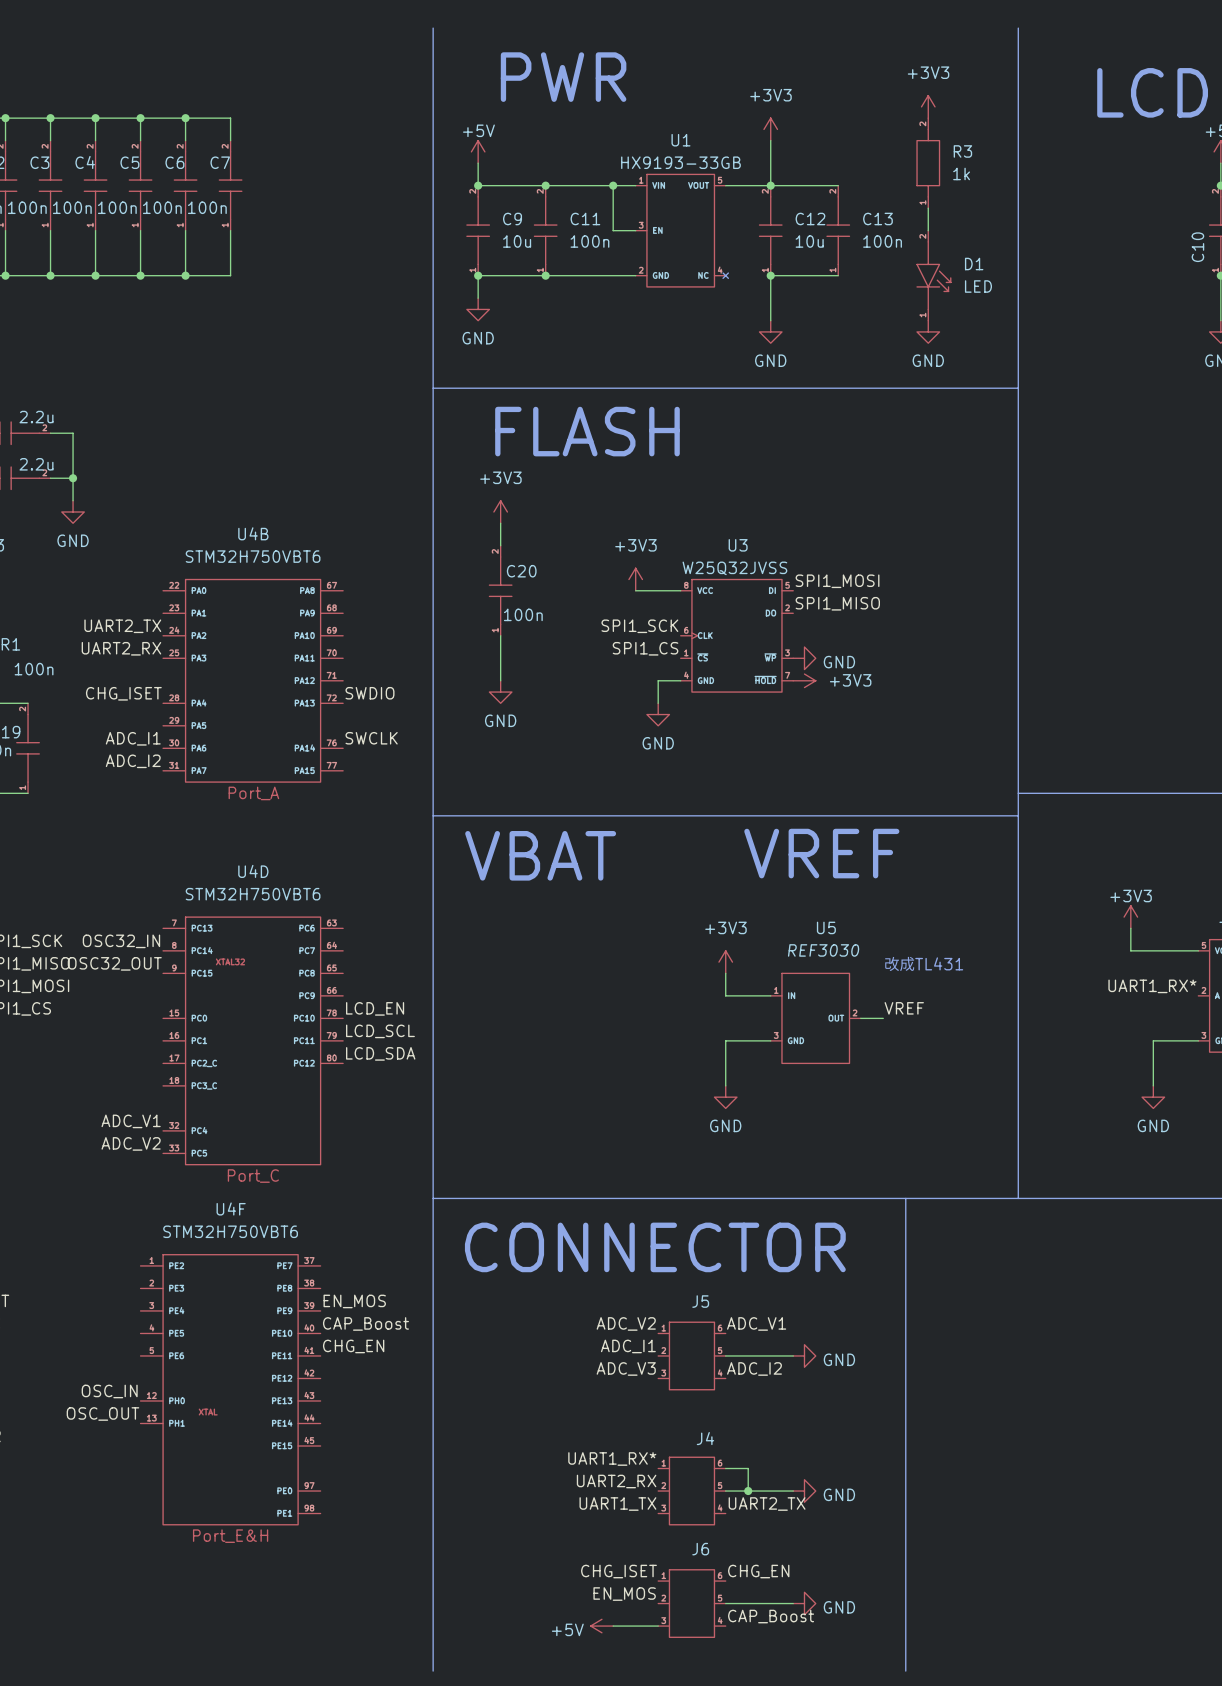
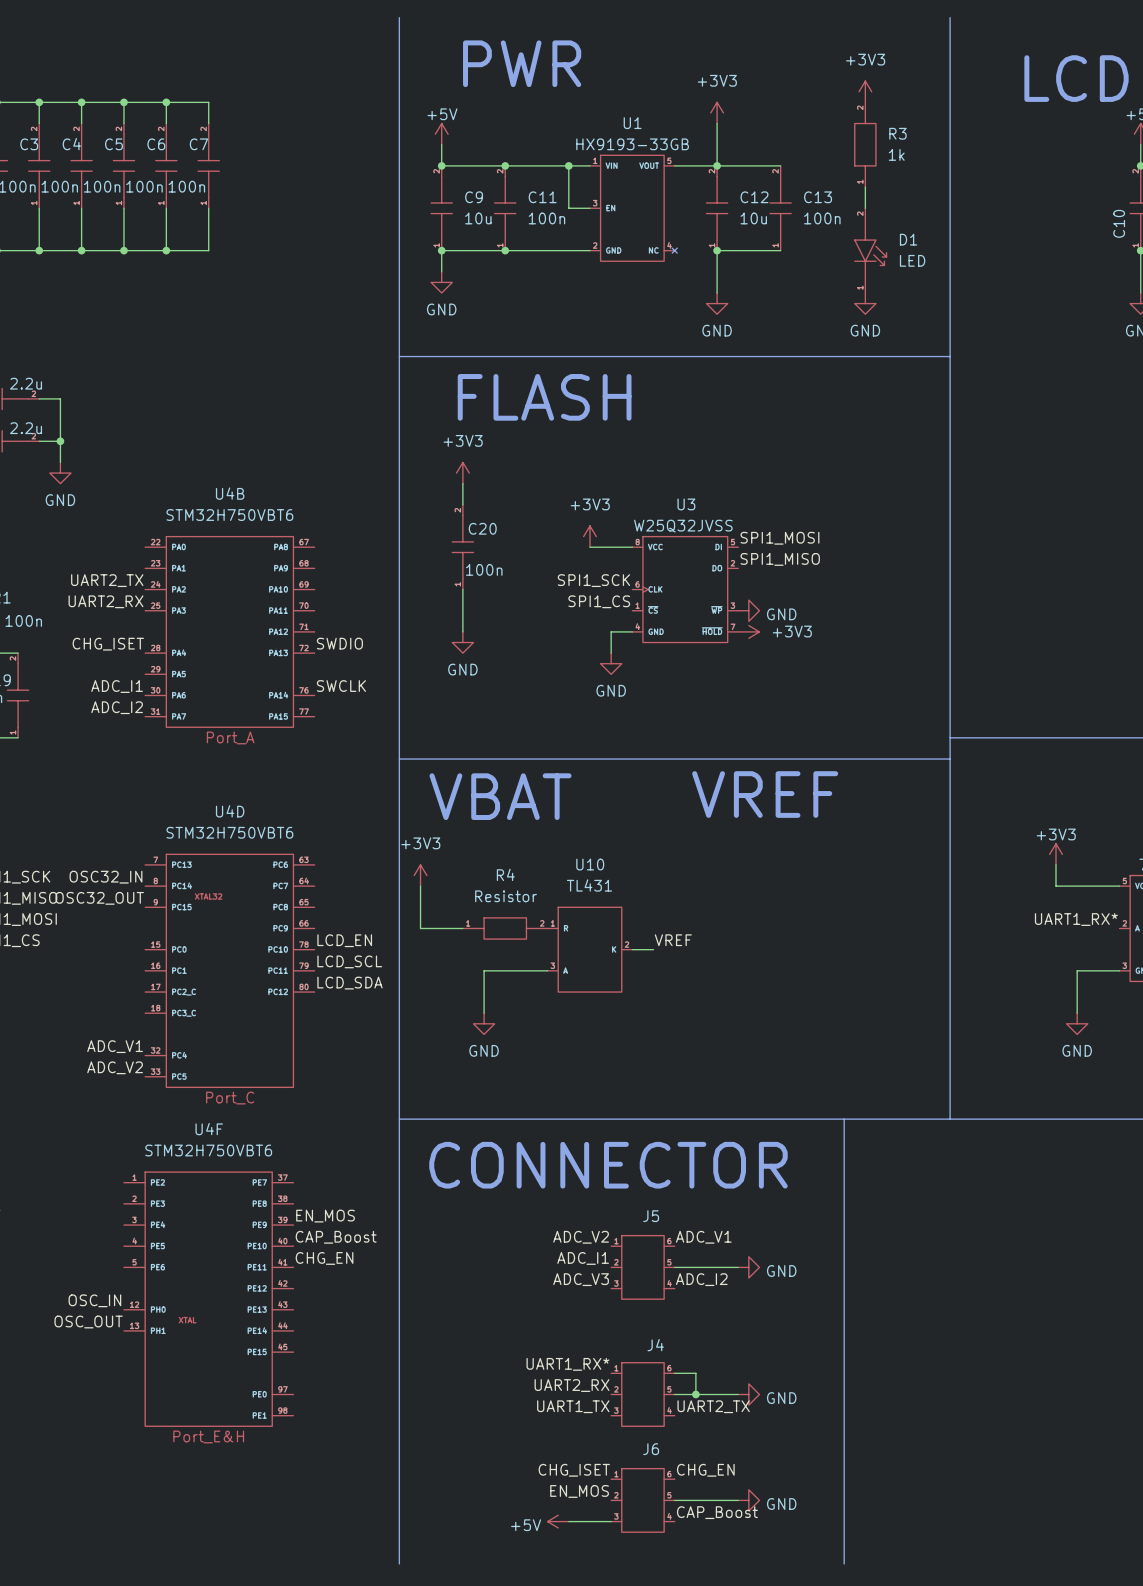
power symbol: none -> +3V3 (420, 875)
wire: none -> (420, 886) (420, 928) (462, 928)
power symbol: +3V3 (725, 962) -> none
text: 改成TL431 (923, 964) -> none
wire: (725, 973) (725, 995) (770, 995) -> none
R4: none -> Resistor (505, 928)
label position: VREF (904, 1008) -> VREF (673, 940)
U10: none -> TL431 (589, 949)
U5: REF3030 (815, 1018) -> none
wire: (860, 1018) (883, 1018) -> (632, 949) (653, 949)
wire: none -> (547, 970) (484, 970) (484, 1013)
wire: (770, 1040) (725, 1040) (725, 1085) -> none
power symbol position: GND (725, 1097) -> GND (484, 1023)

